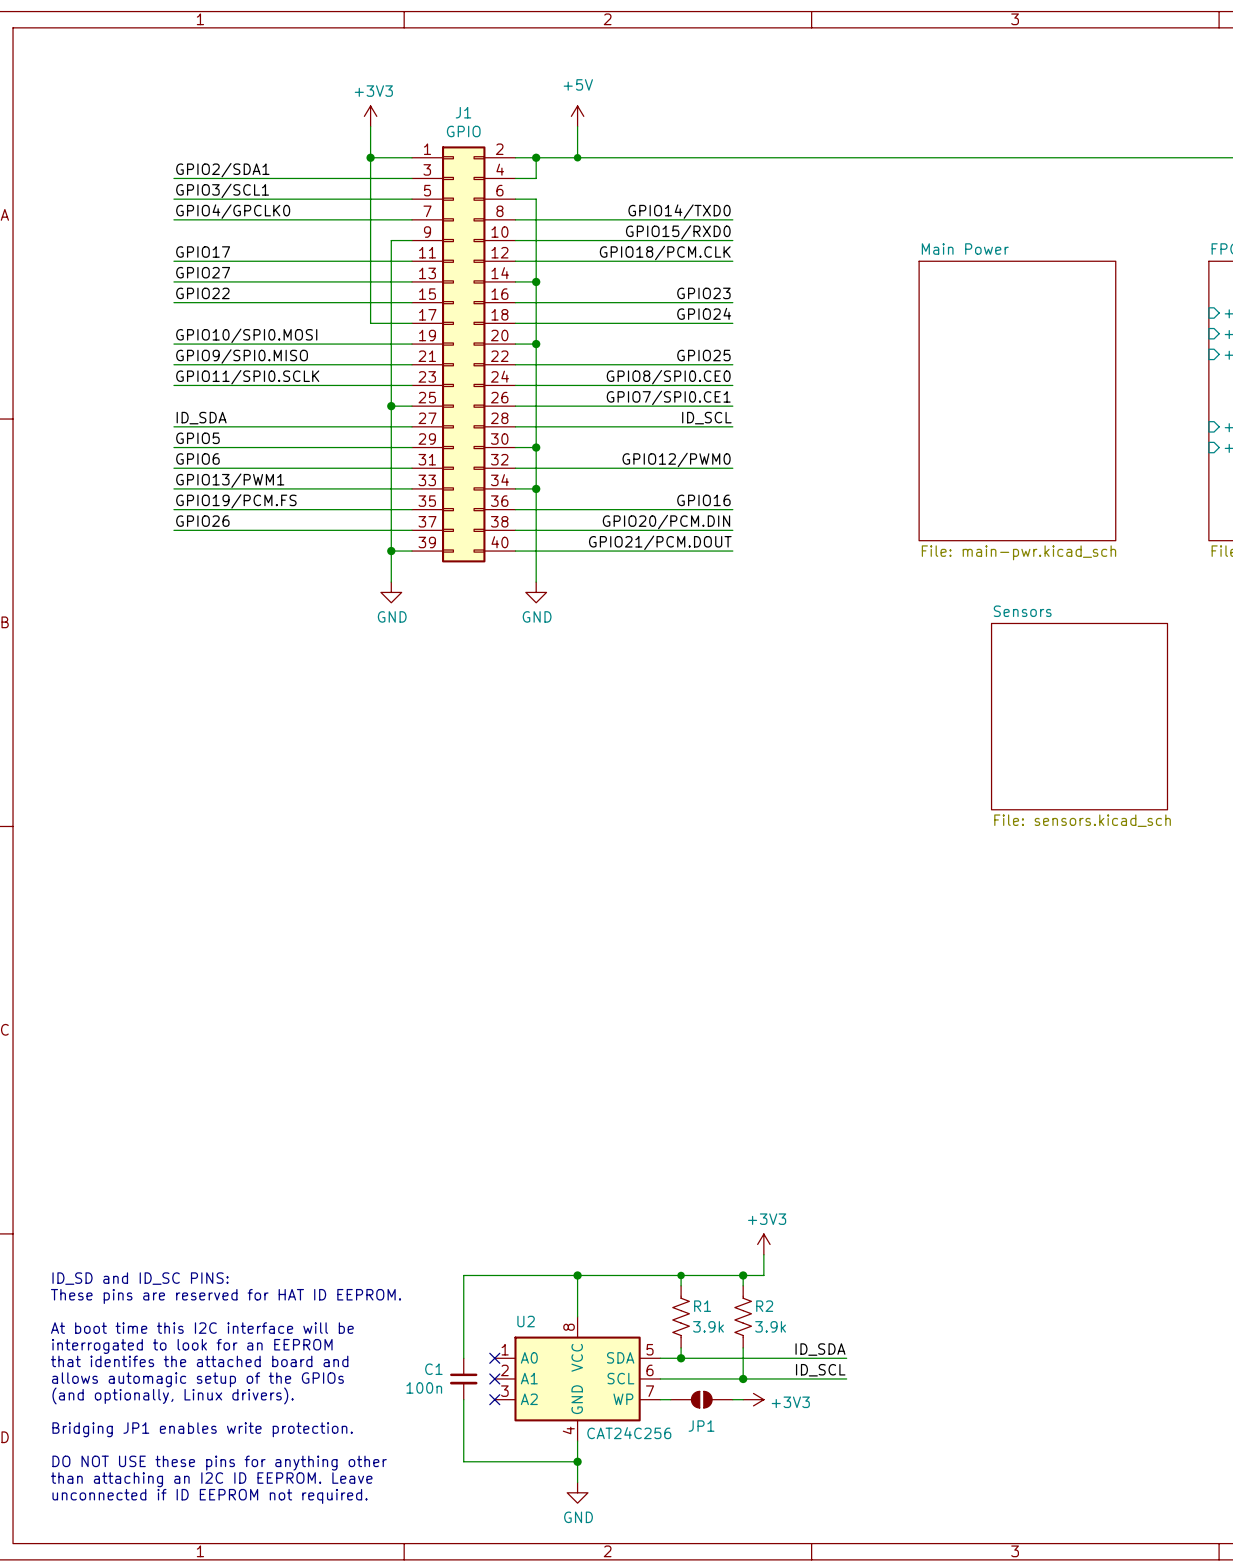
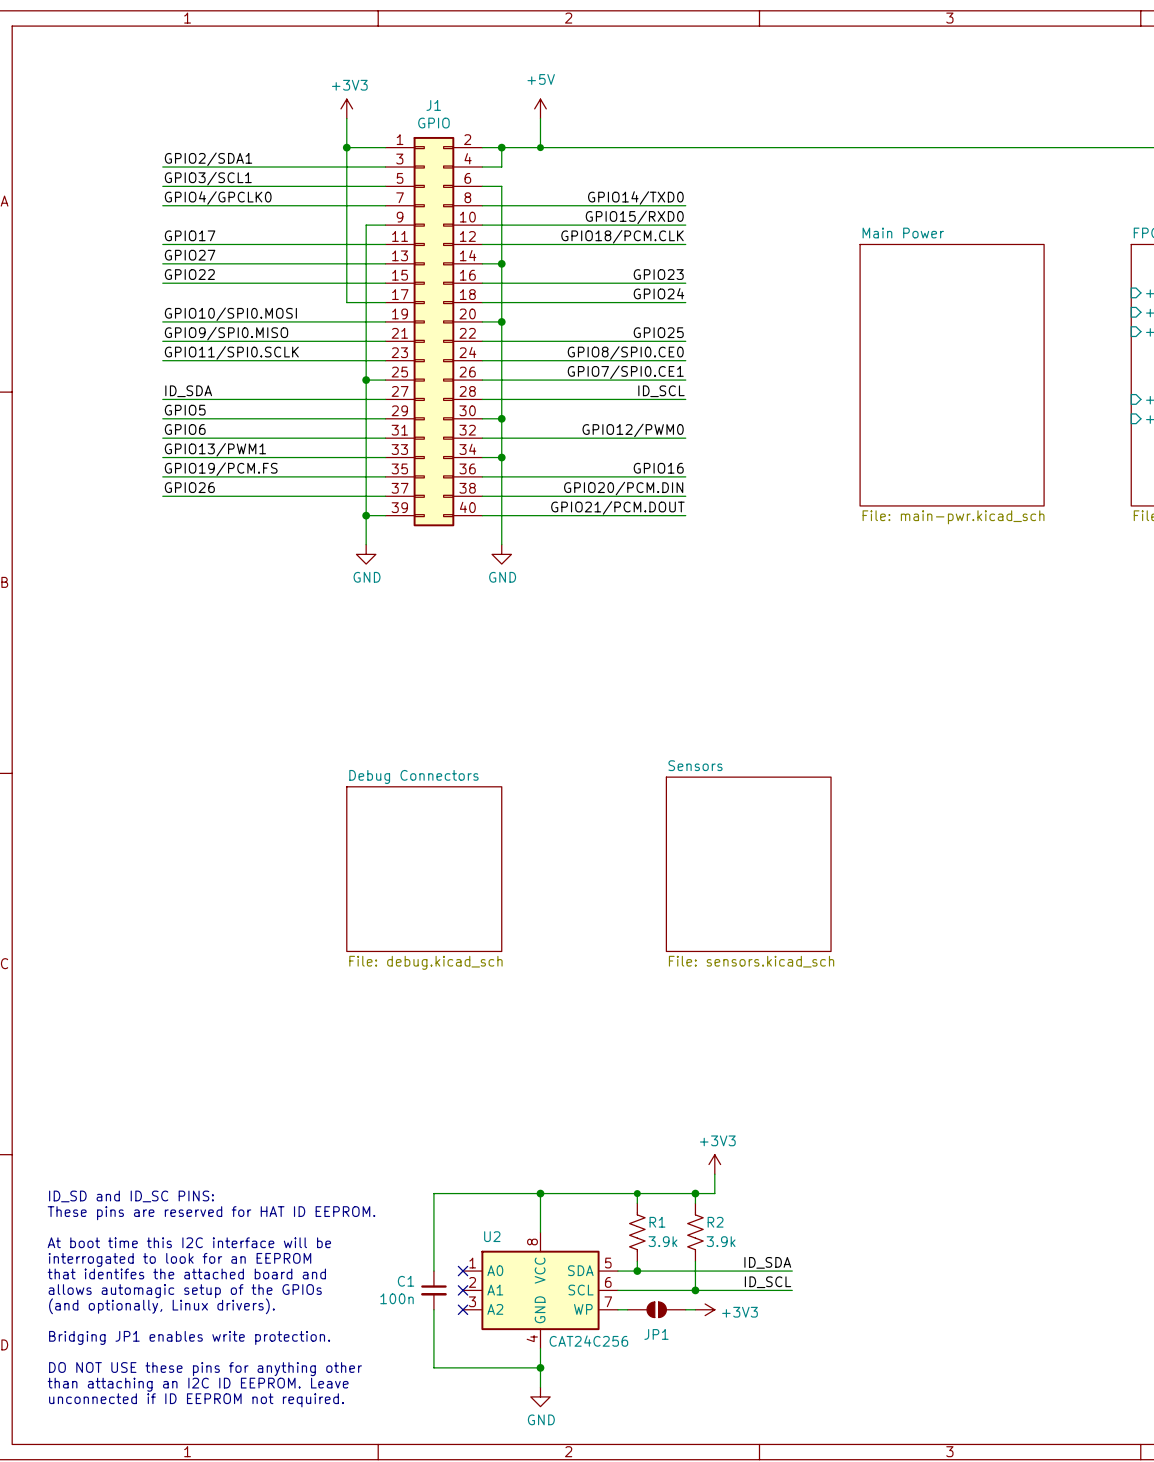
sheet Sensors: File: sensors.kicad_sch (1079, 716) -> none
sheet Sensors: none -> File: sensors.kicad_sch (748, 864)
sheet Debug Connectors: none -> File: debug.kicad_sch (424, 869)

